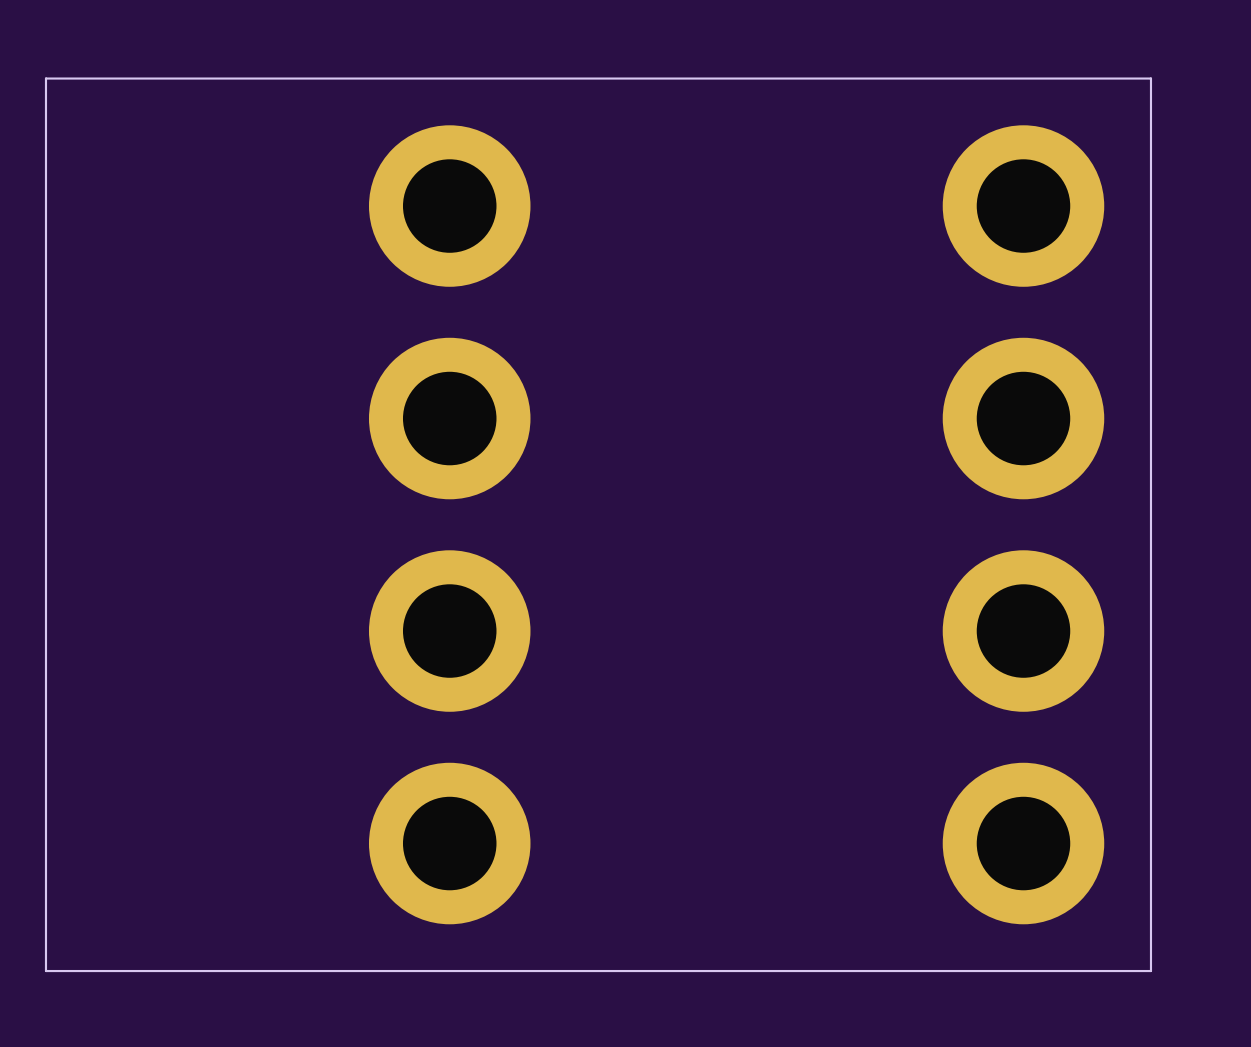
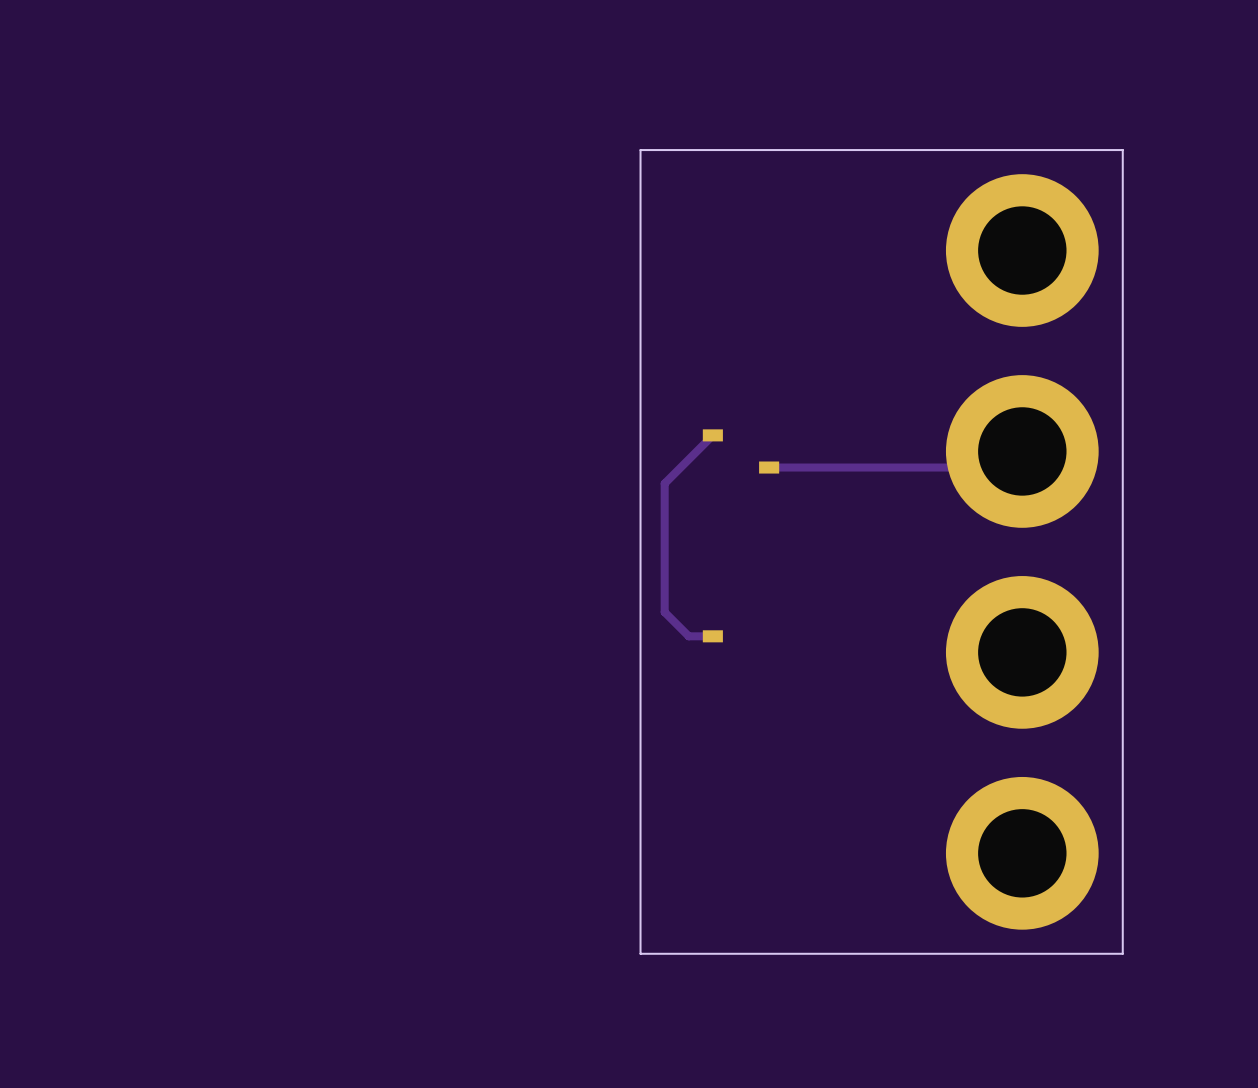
board edge: (1150, 78) (45, 78) (45, 971) (1150, 971) (1150, 78) -> none
board edge: none -> (1122, 150) (640, 150) (640, 953) (1122, 953) (1122, 150)
part: (449, 206) -> none
track: none -> (712, 435) (664, 483) (664, 612) (688, 636) (712, 636)
part: (449, 418) -> none
part: none -> (740, 451)
track: none -> (1022, 451) (1006, 467) (769, 467)
part: none -> (712, 636)
part: (449, 631) -> none
part: (449, 843) -> none

